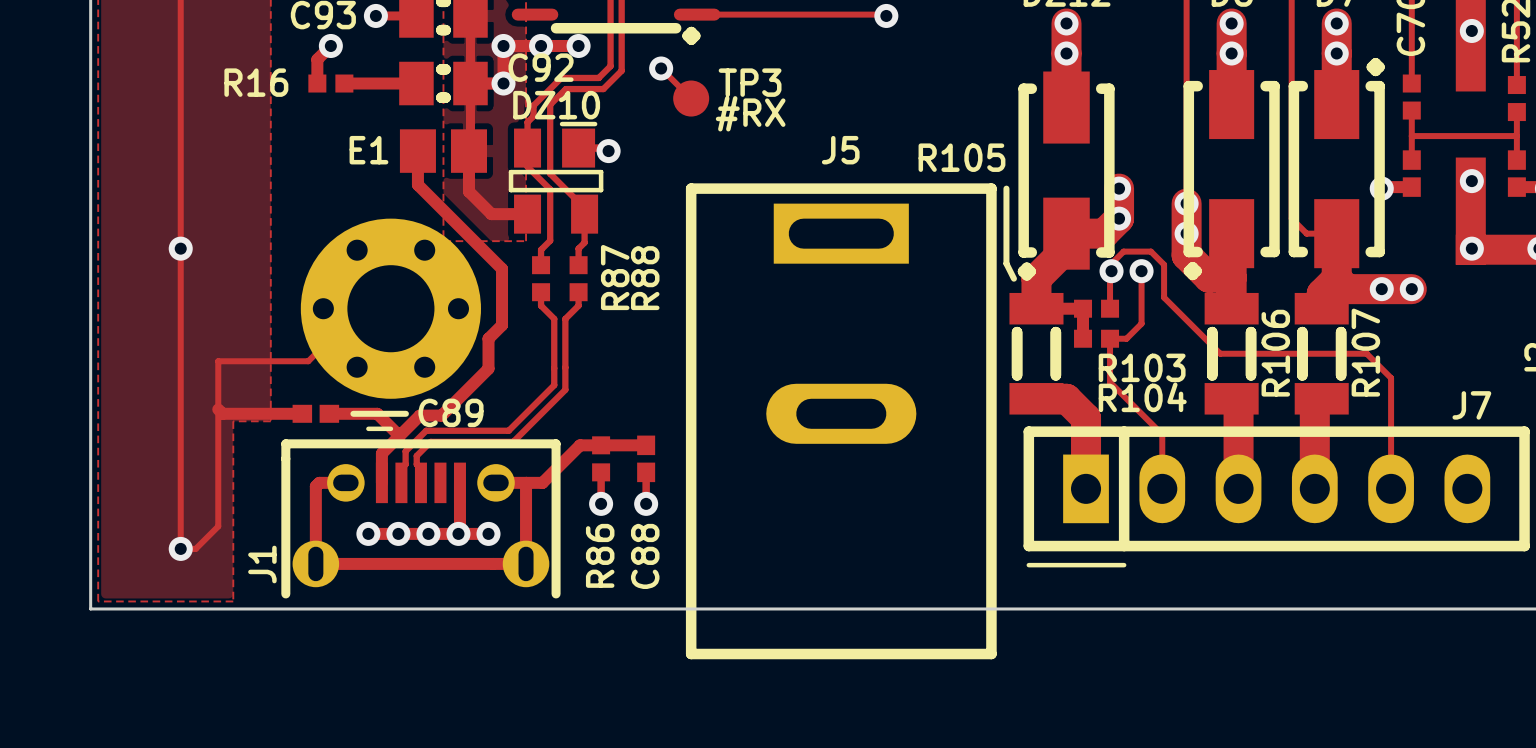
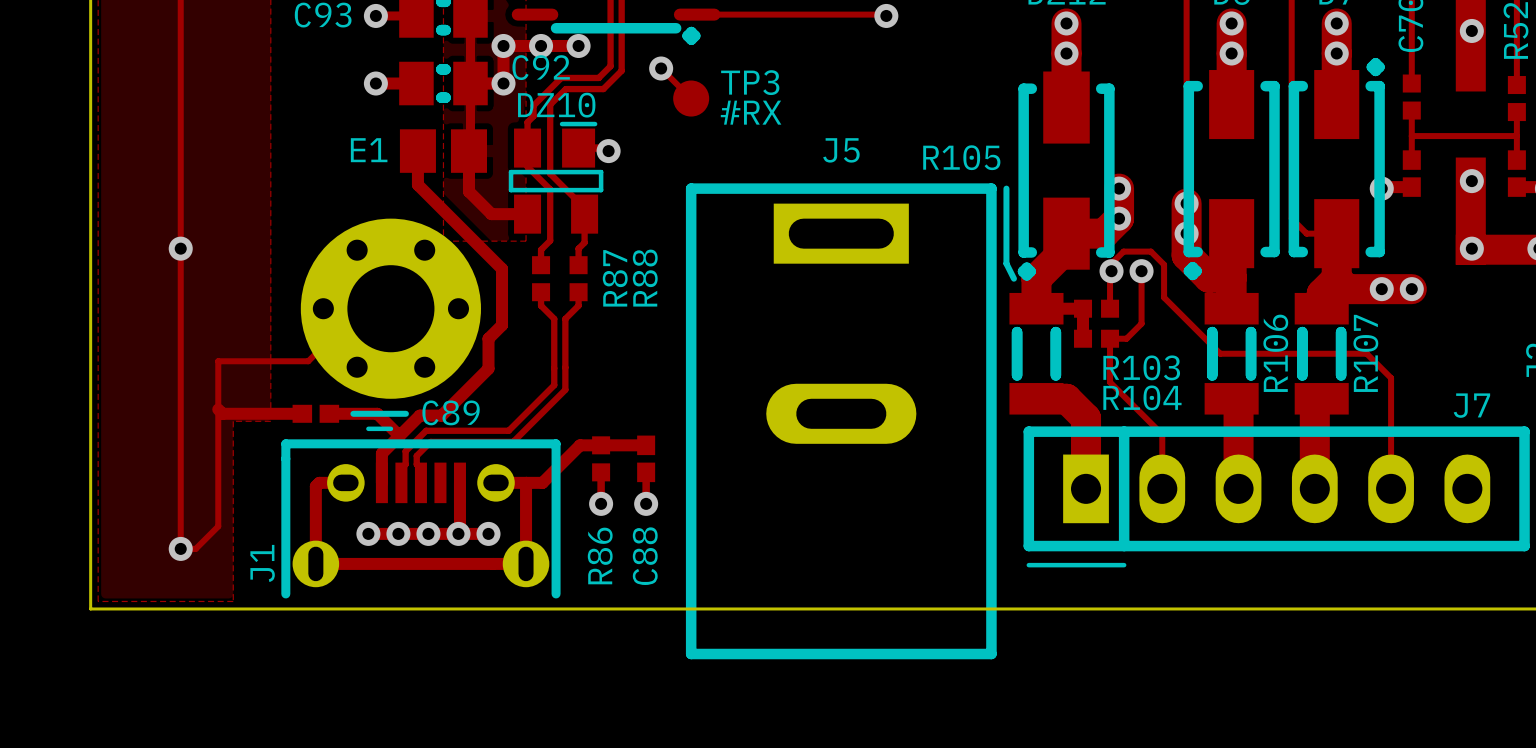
track: (330, 45) (317, 59) (317, 83) -> none
via position: (330, 45) -> (375, 83)
R16: (330, 83) -> none
track: (344, 83) (375, 83) -> none

